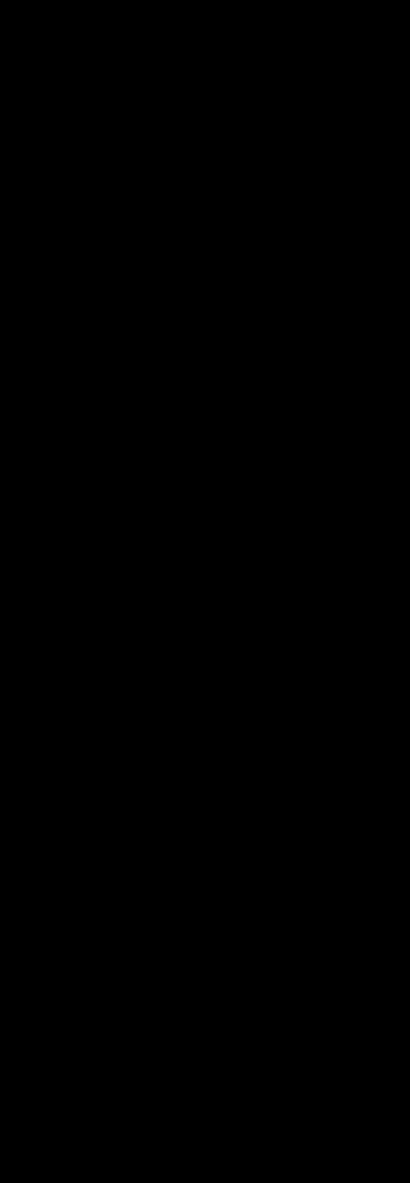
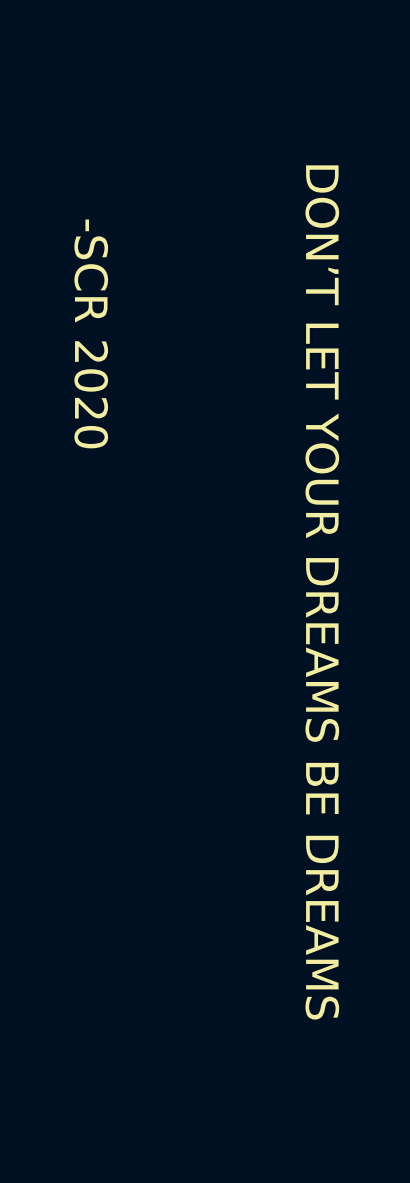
text: none -> -SCR 2020 (91, 333)
text: none -> DON’T LET YOUR DREAMS BE DREAMS (322, 592)

